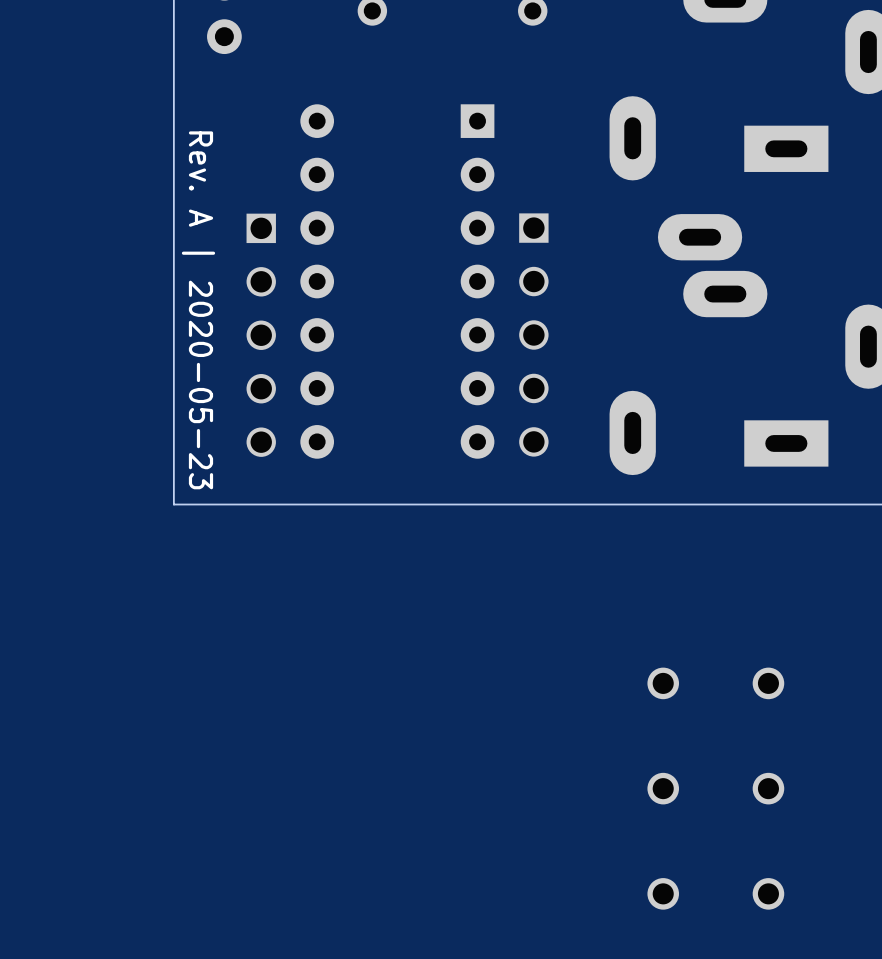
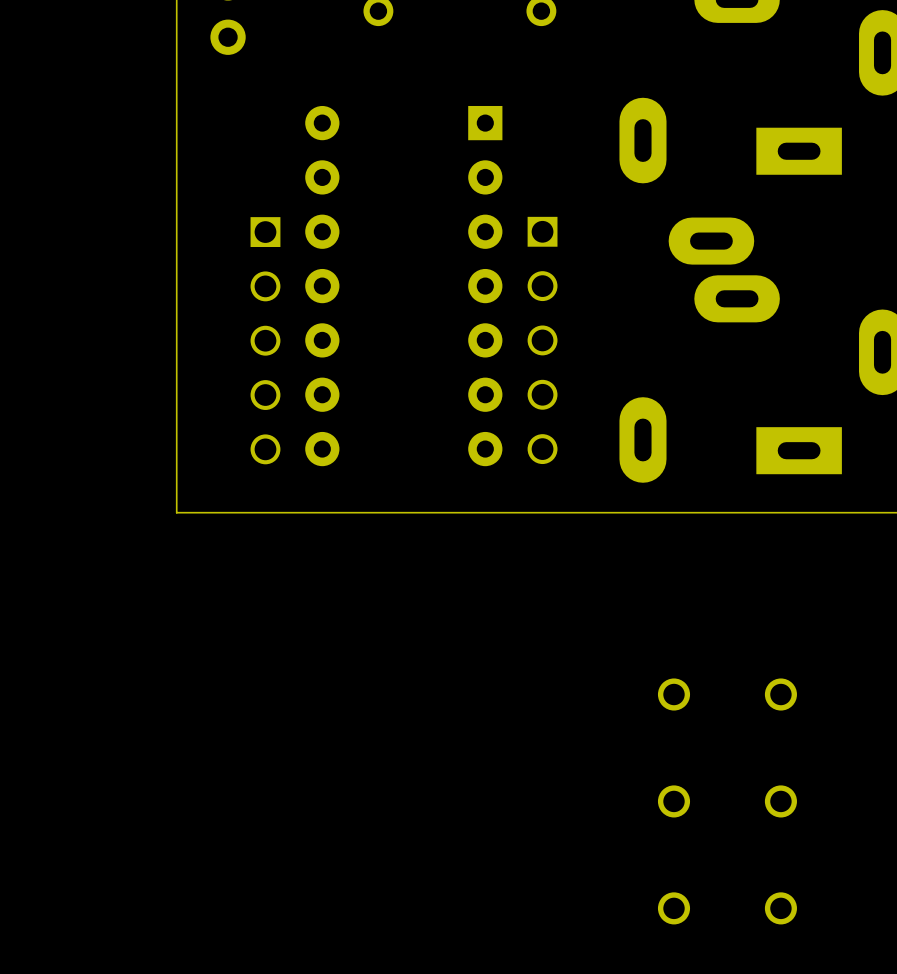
text: Rev. A | 2020-05-23 (198, 310) -> none

